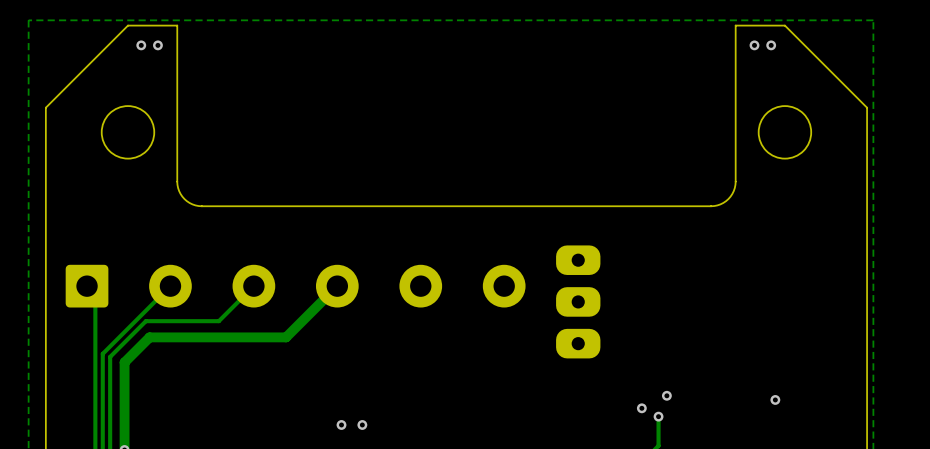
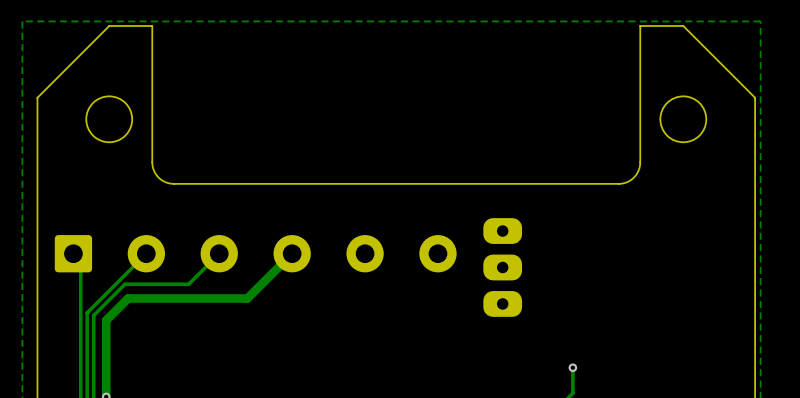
via: (141, 45) -> none
via: (157, 45) -> none
via: (754, 45) -> none
via: (771, 45) -> none
via: (666, 395) -> none
via: (775, 399) -> none
via: (641, 408) -> none
via: (341, 424) -> none
via: (362, 424) -> none

